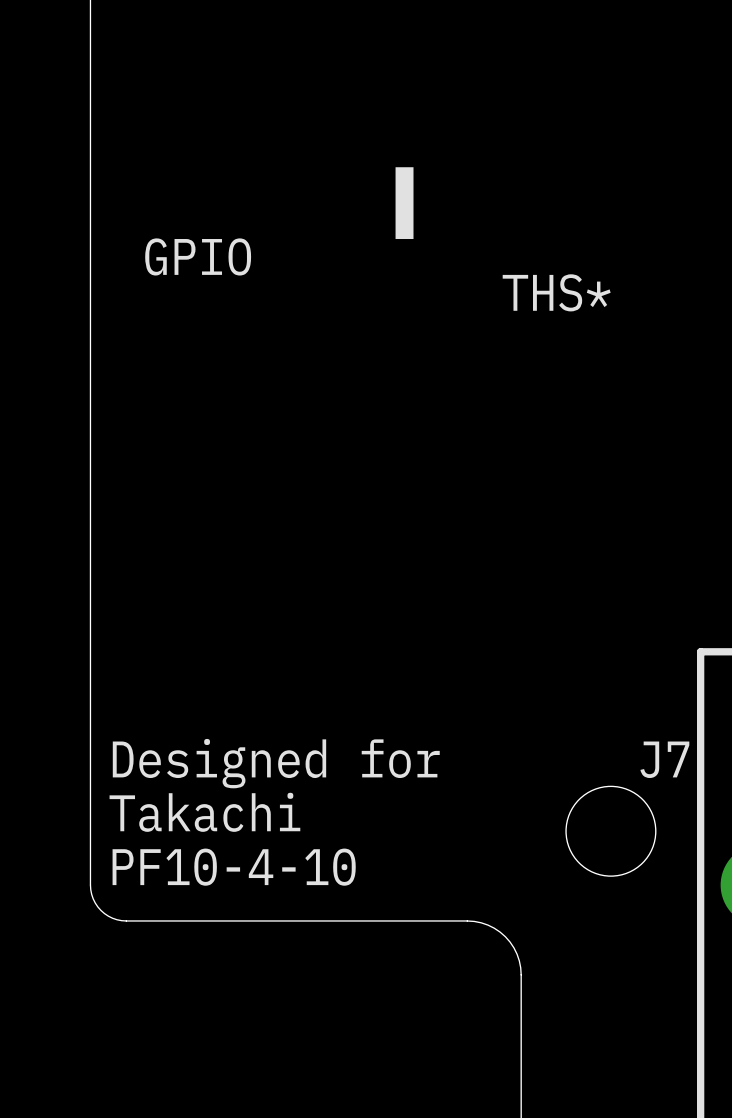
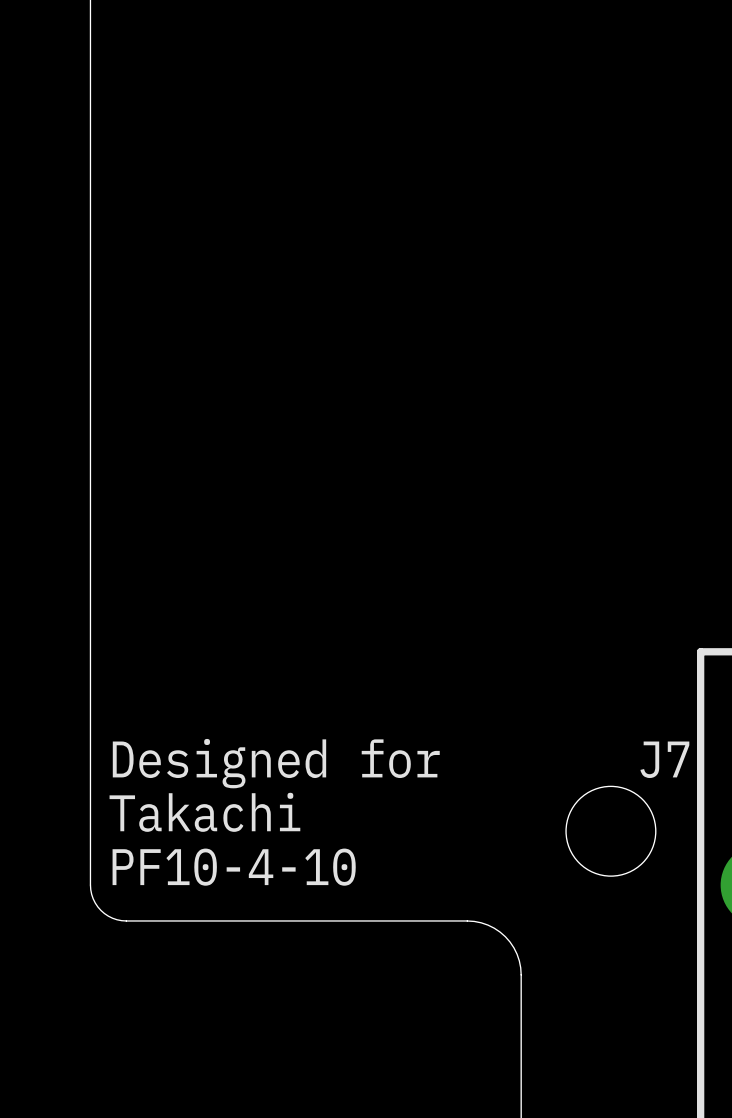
drawing: [395, 167, 414, 240] -> none
text: GPIO (198, 256) -> none
text: THS* (556, 292) -> none

